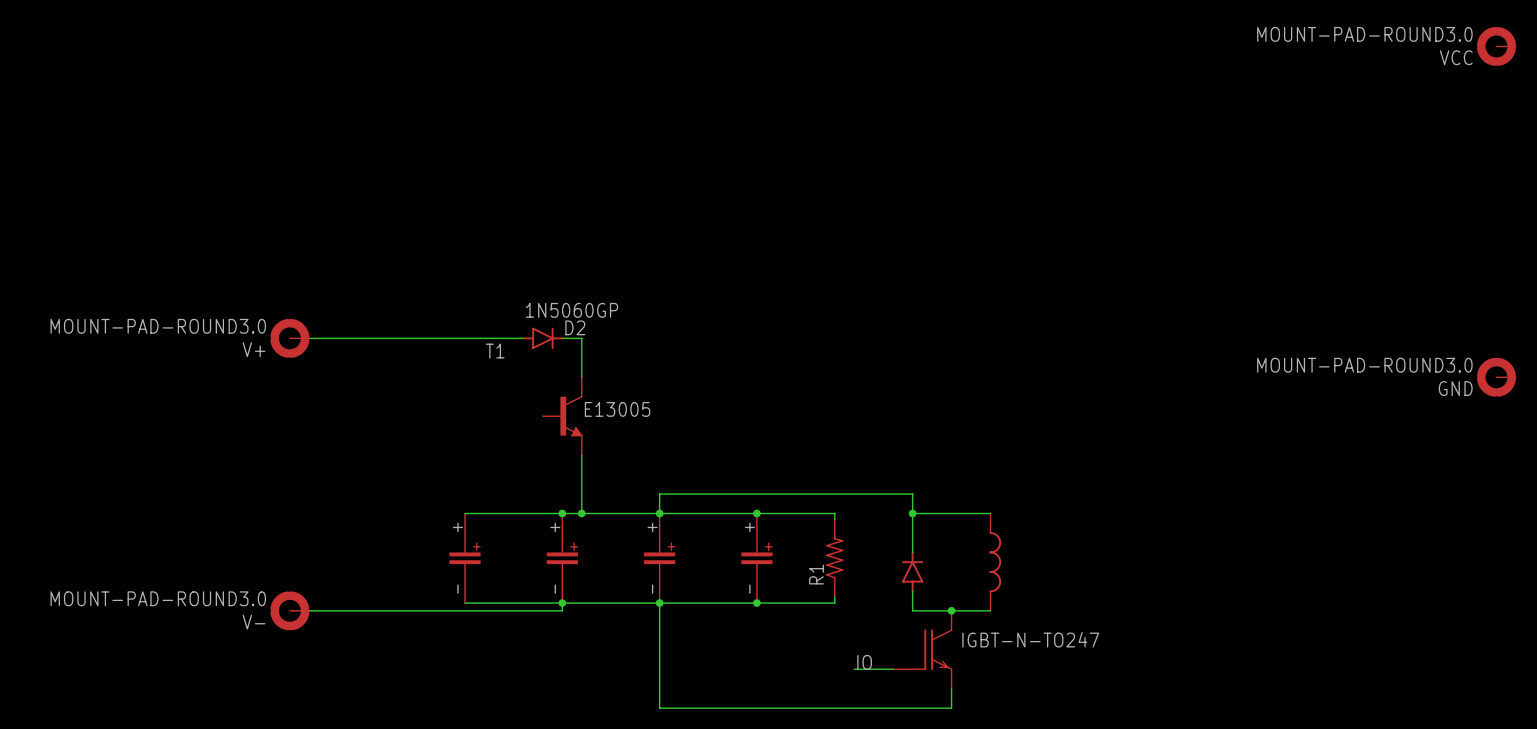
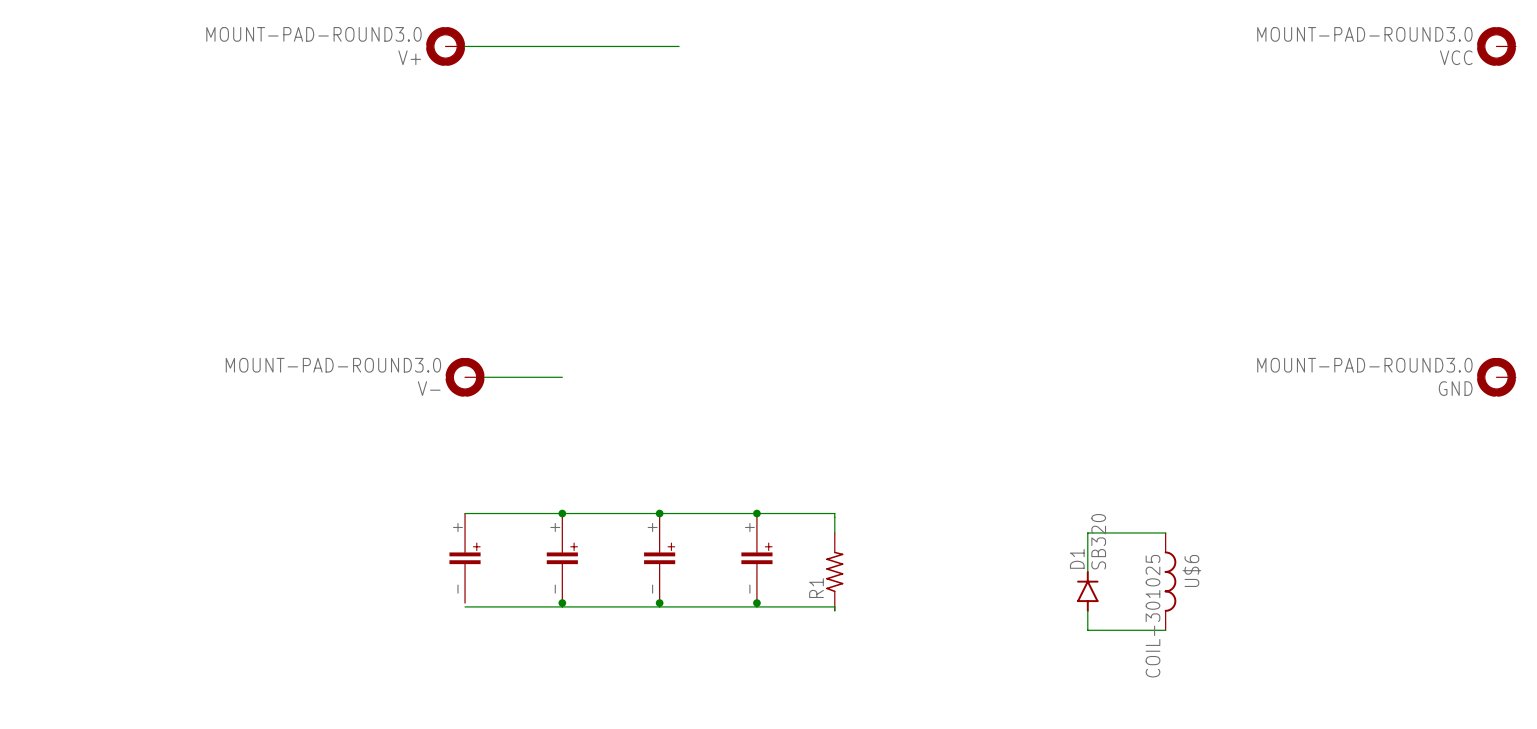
V+: none -> MOUNT-PAD-ROUND3.0 (445, 46)
wire: none -> (465, 46) (679, 46)
V+: MOUNT-PAD-ROUND3.0 (289, 338) -> none
wire: (309, 338) (523, 338) -> none
D2: 1N5060GP (542, 338) -> none
wire: (562, 338) (581, 338) (581, 377) -> none
V-: none -> MOUNT-PAD-ROUND3.0 (465, 377)
wire: none -> (484, 377) (562, 377)
T1: E13005 (562, 416) -> none
wire: (581, 455) (581, 513) -> none
junction: (581, 513) -> none
wire: (659, 513) (659, 494) (912, 494) (912, 552) -> none
wire: (912, 513) (990, 513) -> none
junction: (912, 513) -> none
wire: none -> (1165, 532) (1087, 532) (1087, 571)
R1 position: (834, 558) -> (834, 571)
part: (995, 562) -> none
part: (912, 571) -> none
U$6: none -> COIL-301025 (1170, 581)
wire: (912, 591) (912, 610) (990, 610) -> (1087, 610) (1087, 630) (1165, 630)
D1: none -> SB320 (1087, 591)
wire: (834, 597) (834, 603) (465, 603) -> none
wire: (562, 603) (562, 610) (309, 610) -> none
wire: (659, 603) (659, 708) (951, 708) (951, 688) -> none
wire: none -> (465, 606) (834, 606) (834, 610)
V-: MOUNT-PAD-ROUND3.0 (289, 610) -> none
junction: (951, 610) -> none
part: IGBT-N-TO247 (922, 649) -> none
label: IO (864, 662) -> none
wire: (854, 669) (893, 669) -> none

